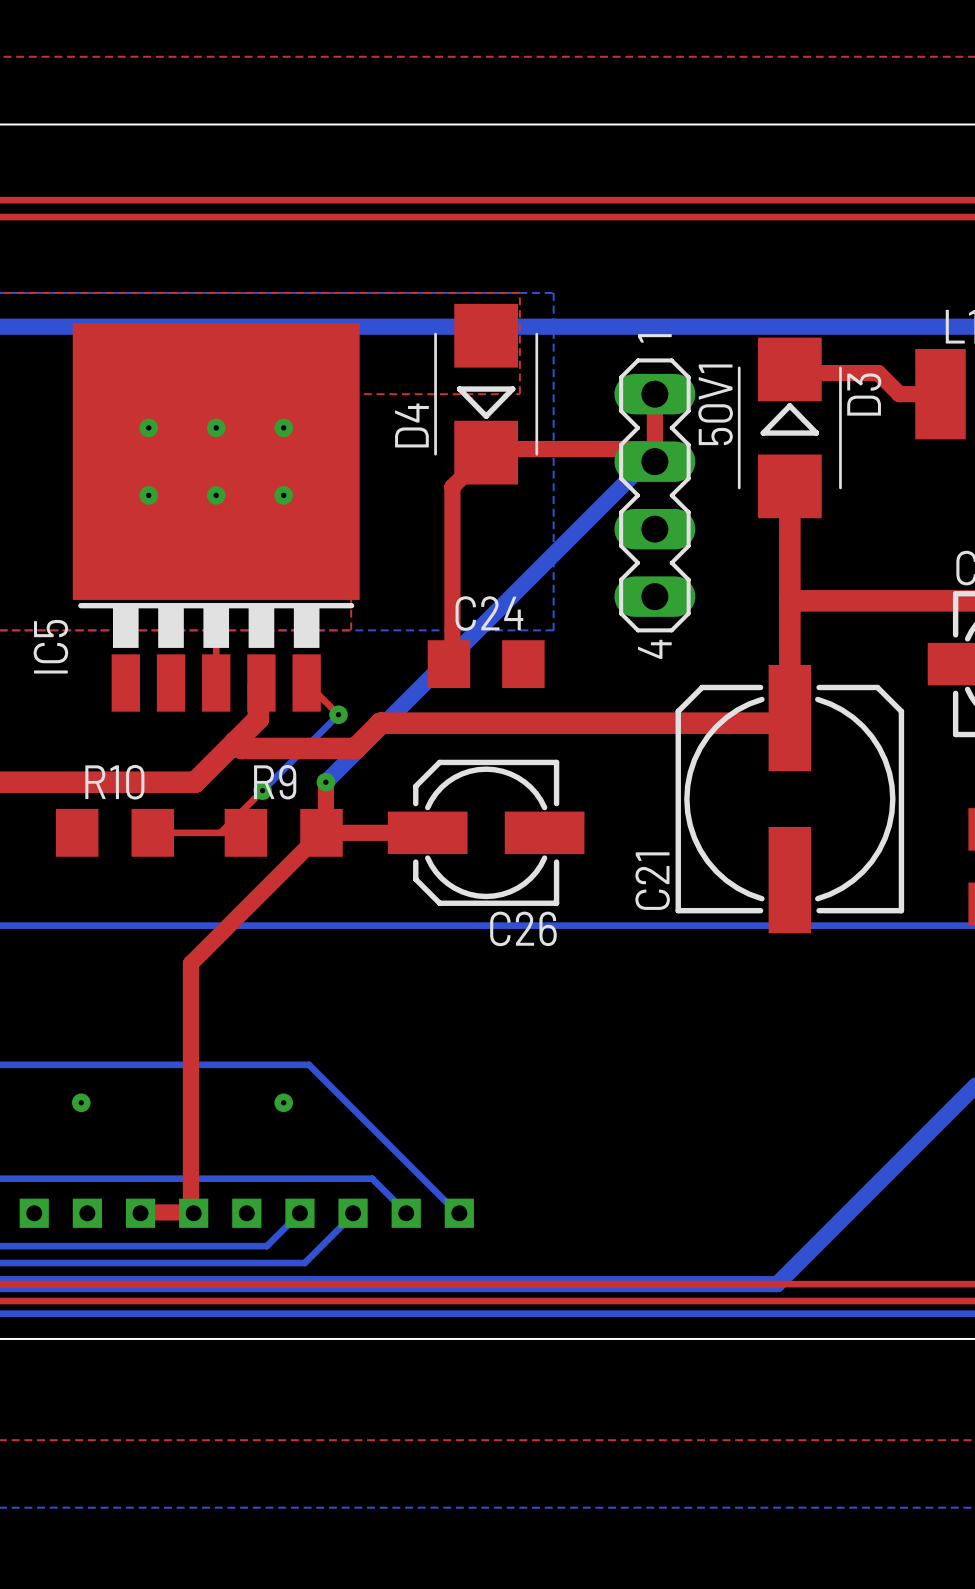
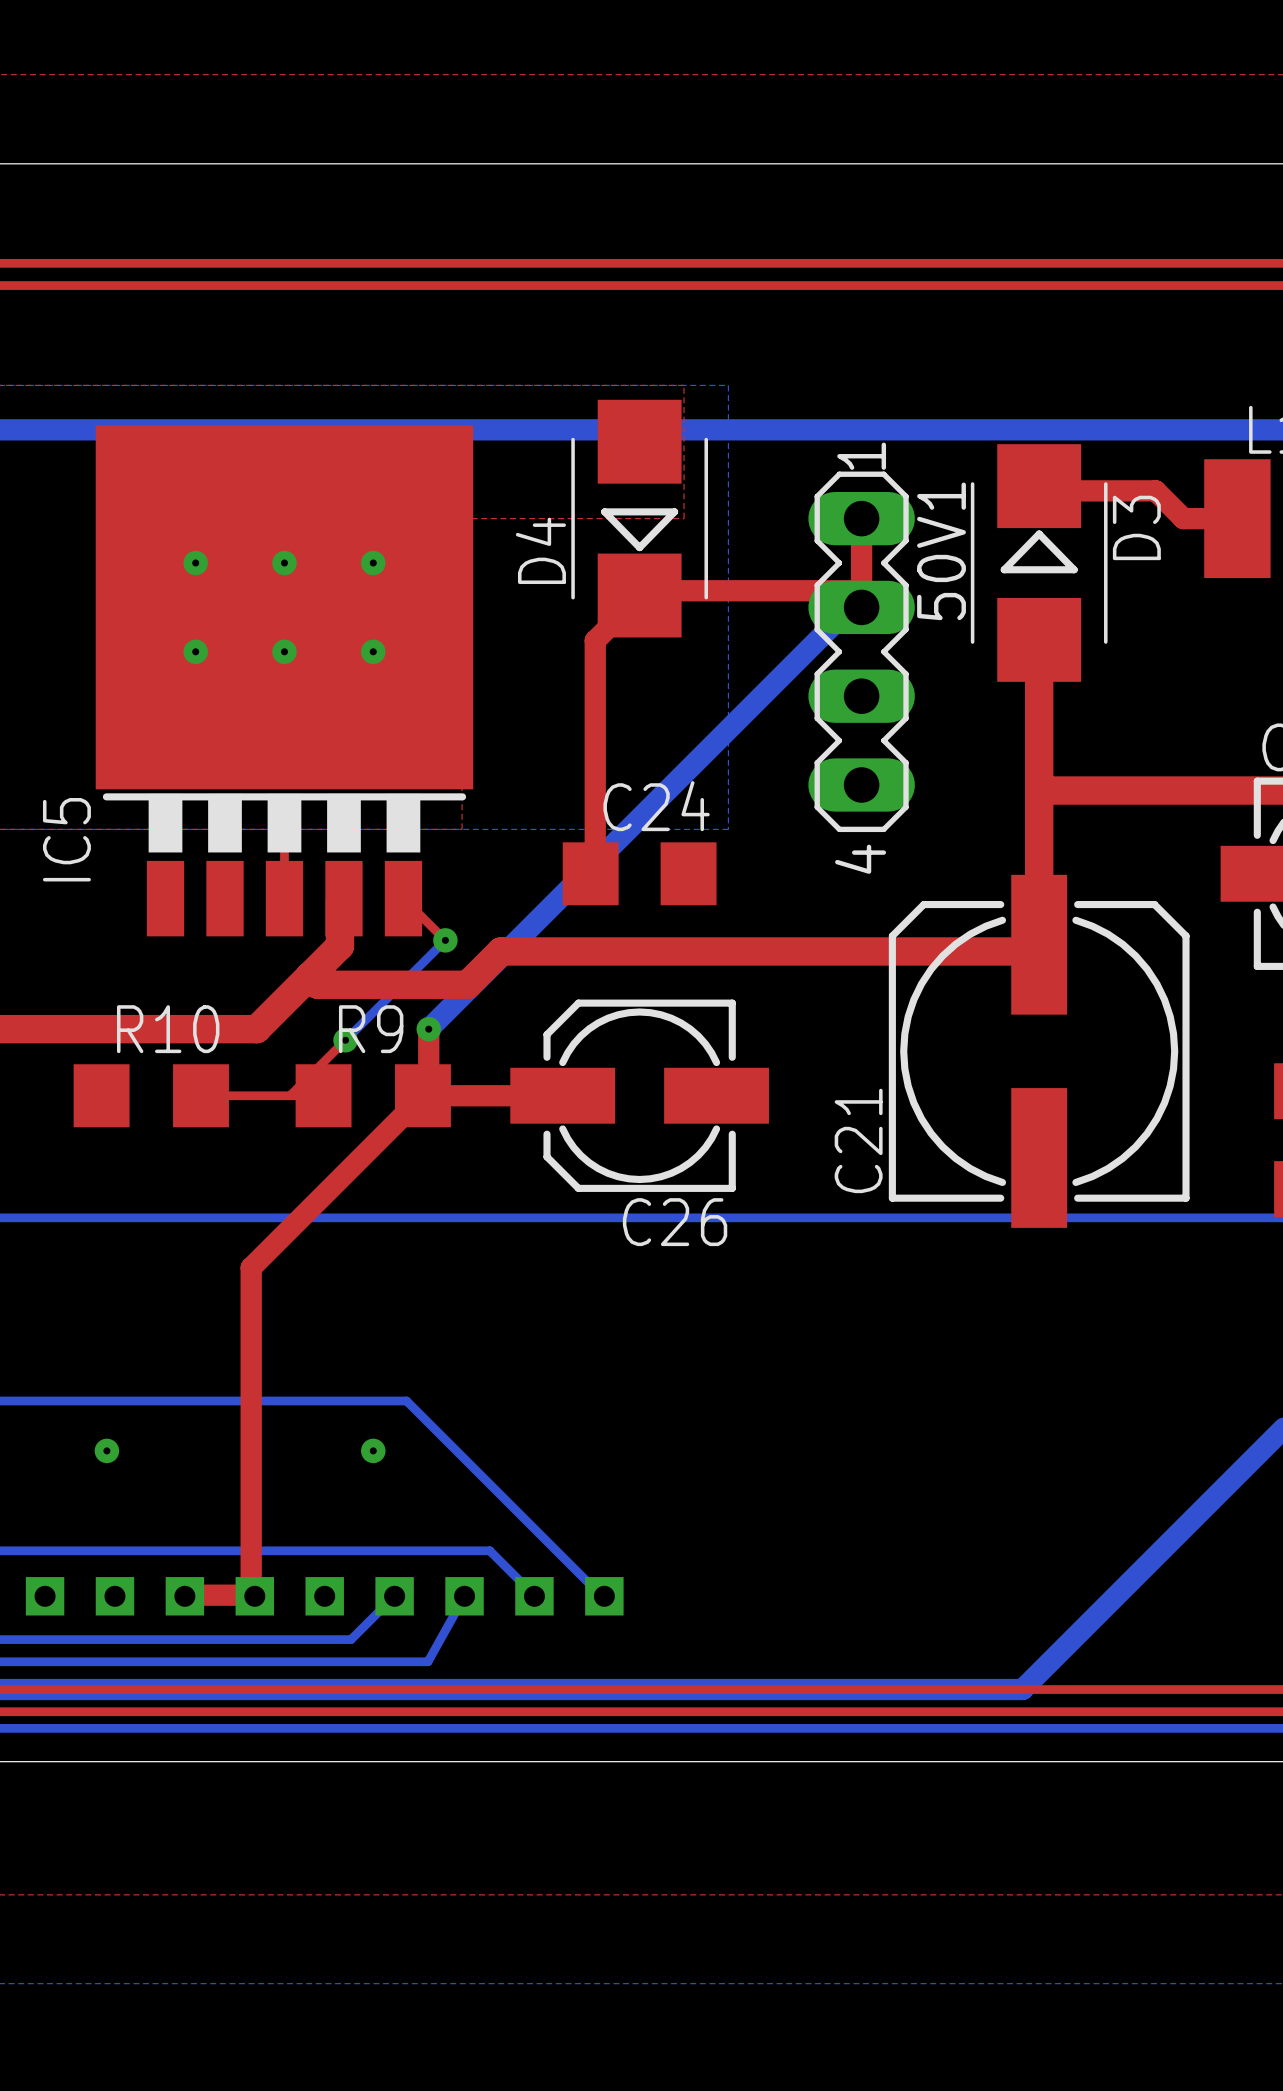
bottom track: (351, 1216) (304, 1263) -> (462, 1600) (428, 1661) (401, 1661)

